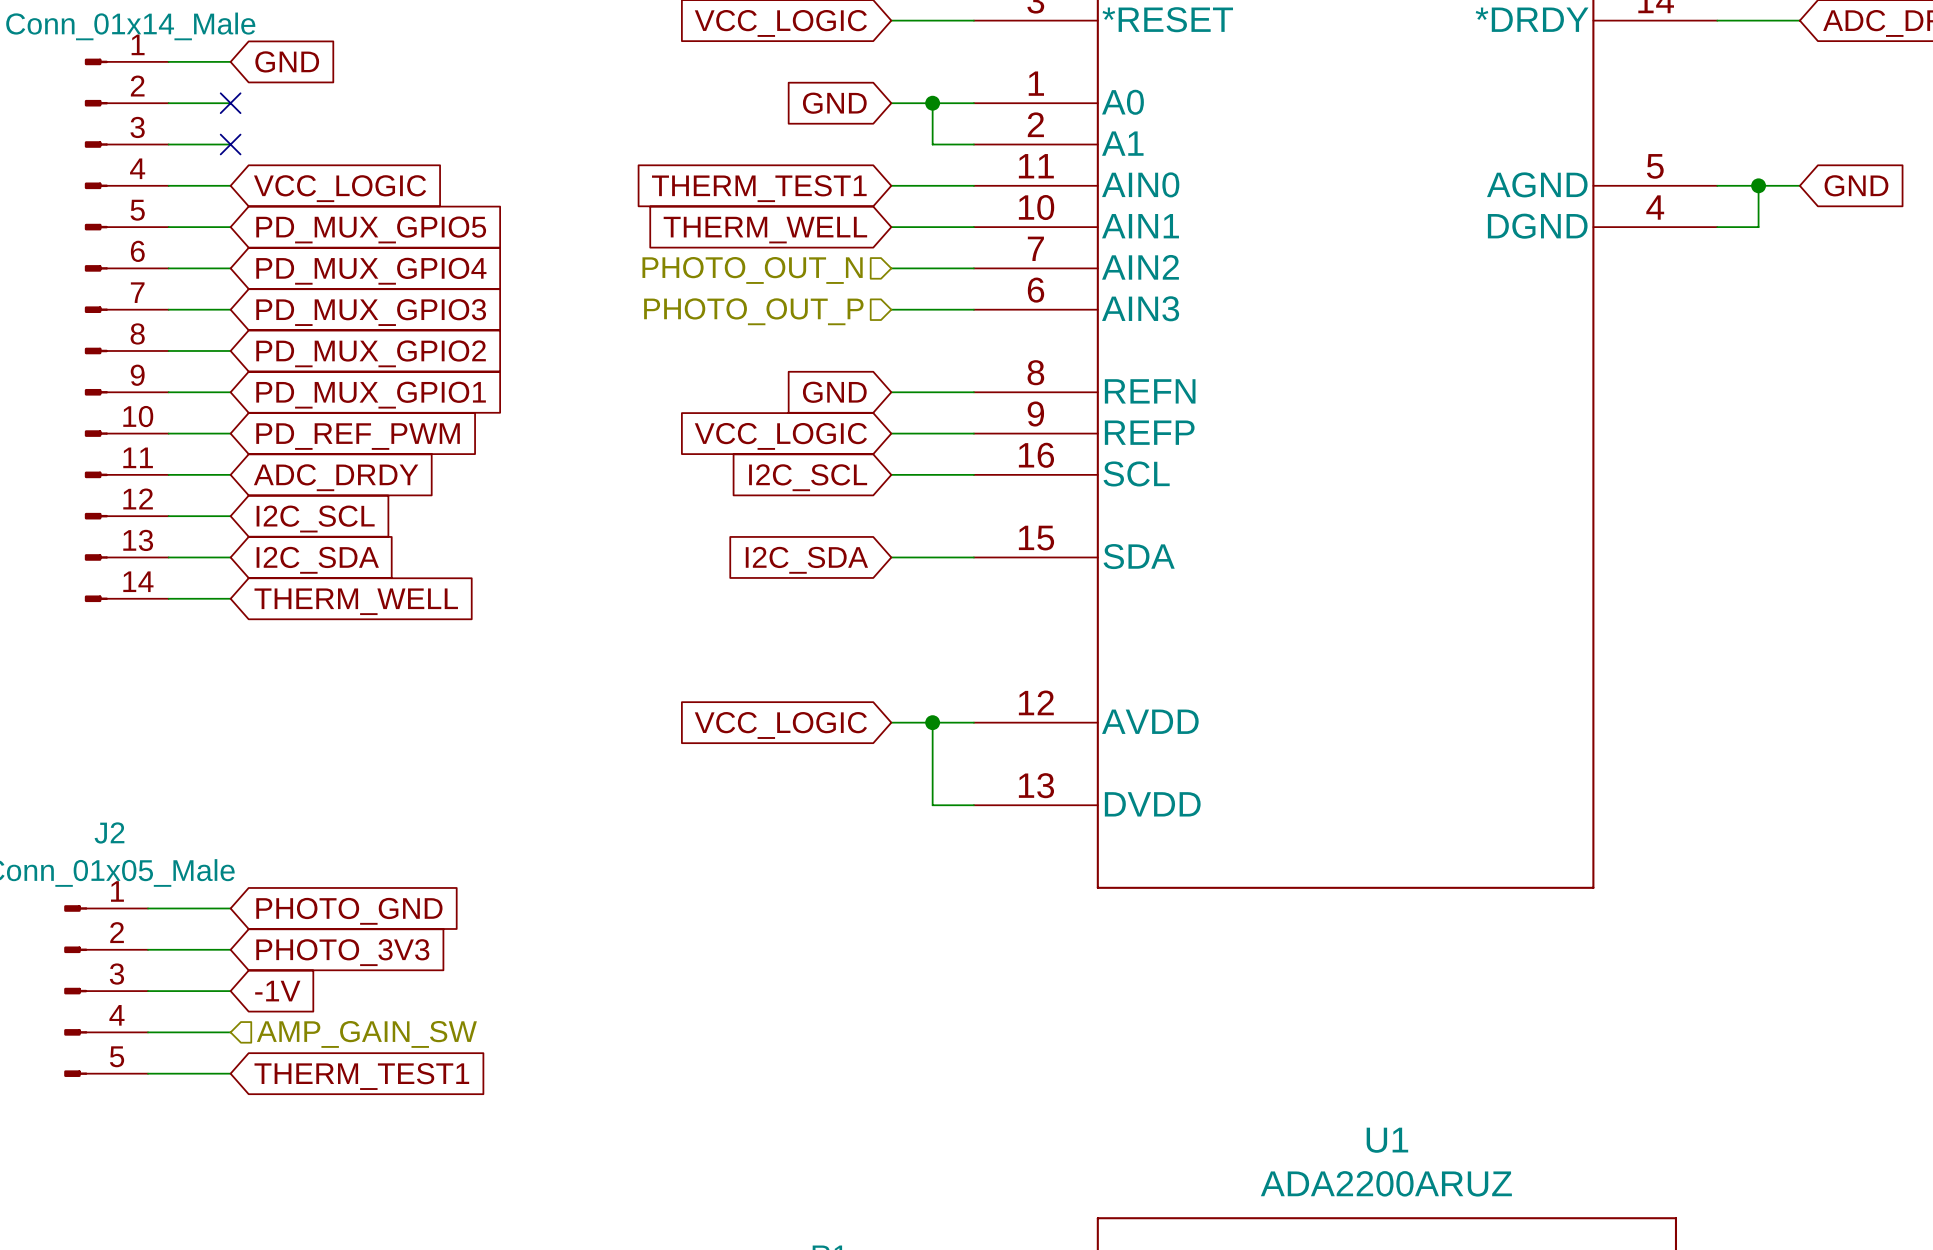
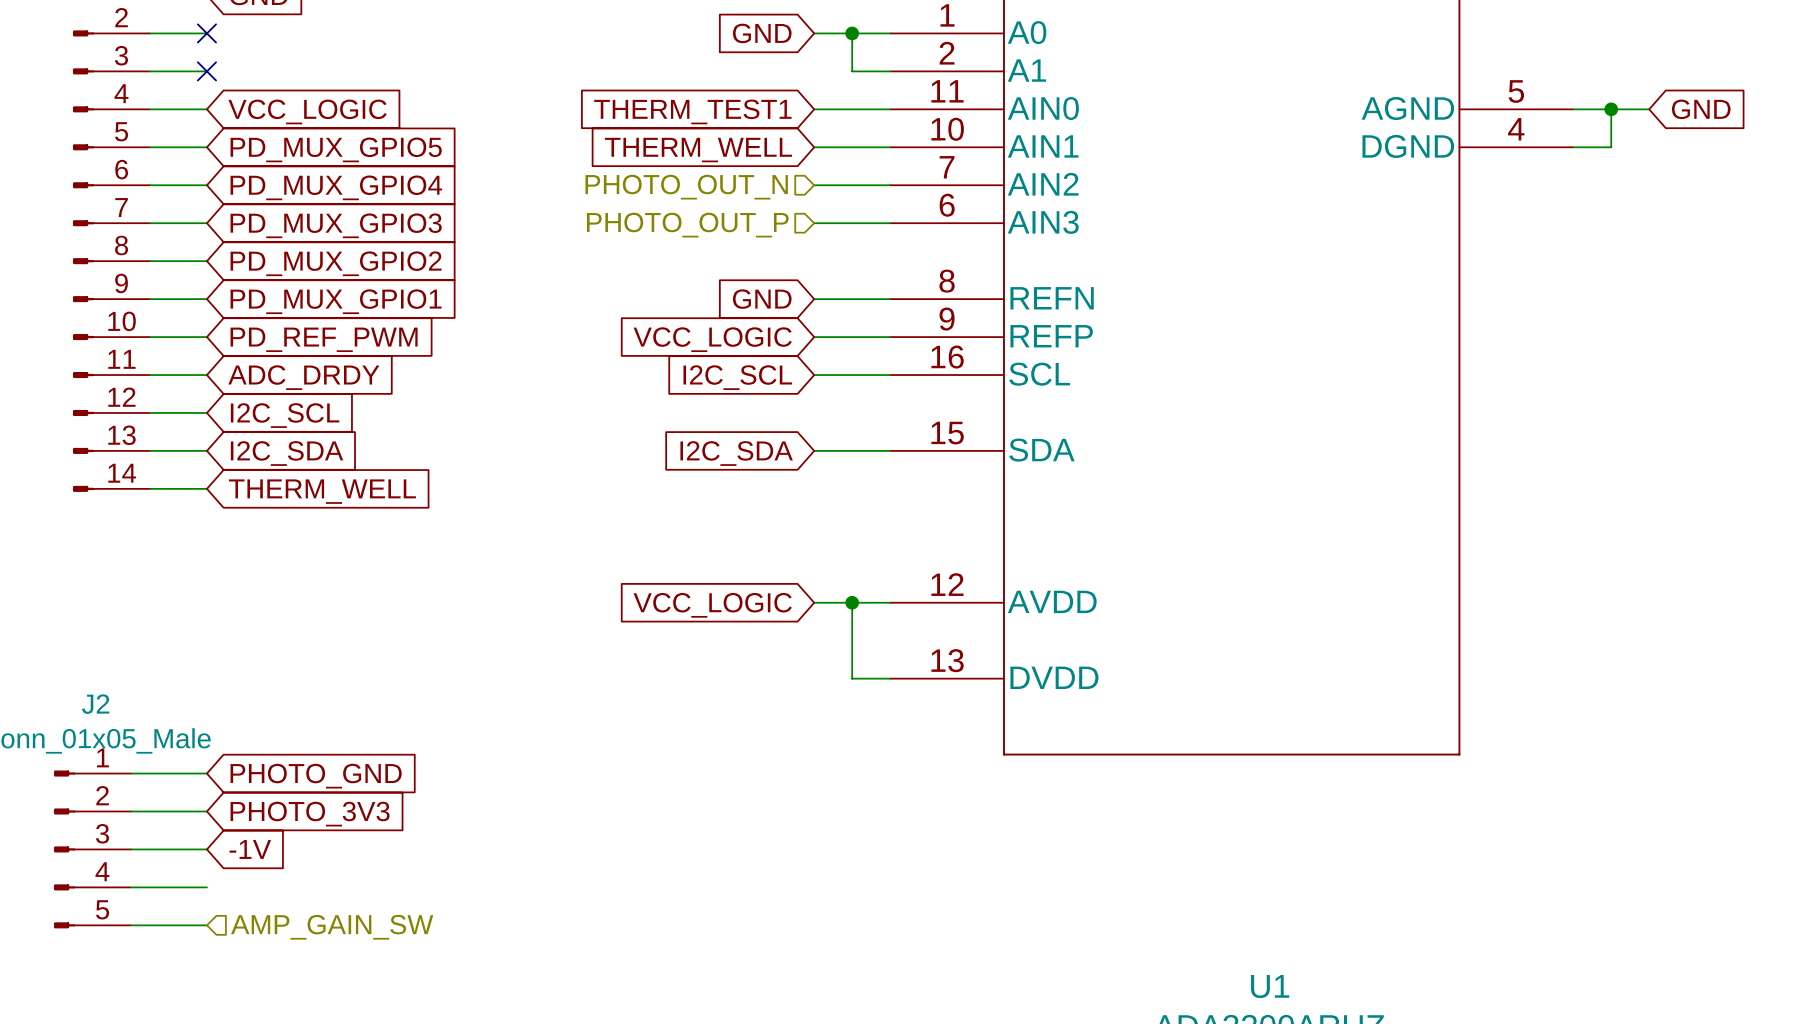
hierarchical label position: AMP_GAIN_SW (366, 1034) -> AMP_GAIN_SW (332, 927)
global label: THERM_TEST1 (361, 1076) -> none

